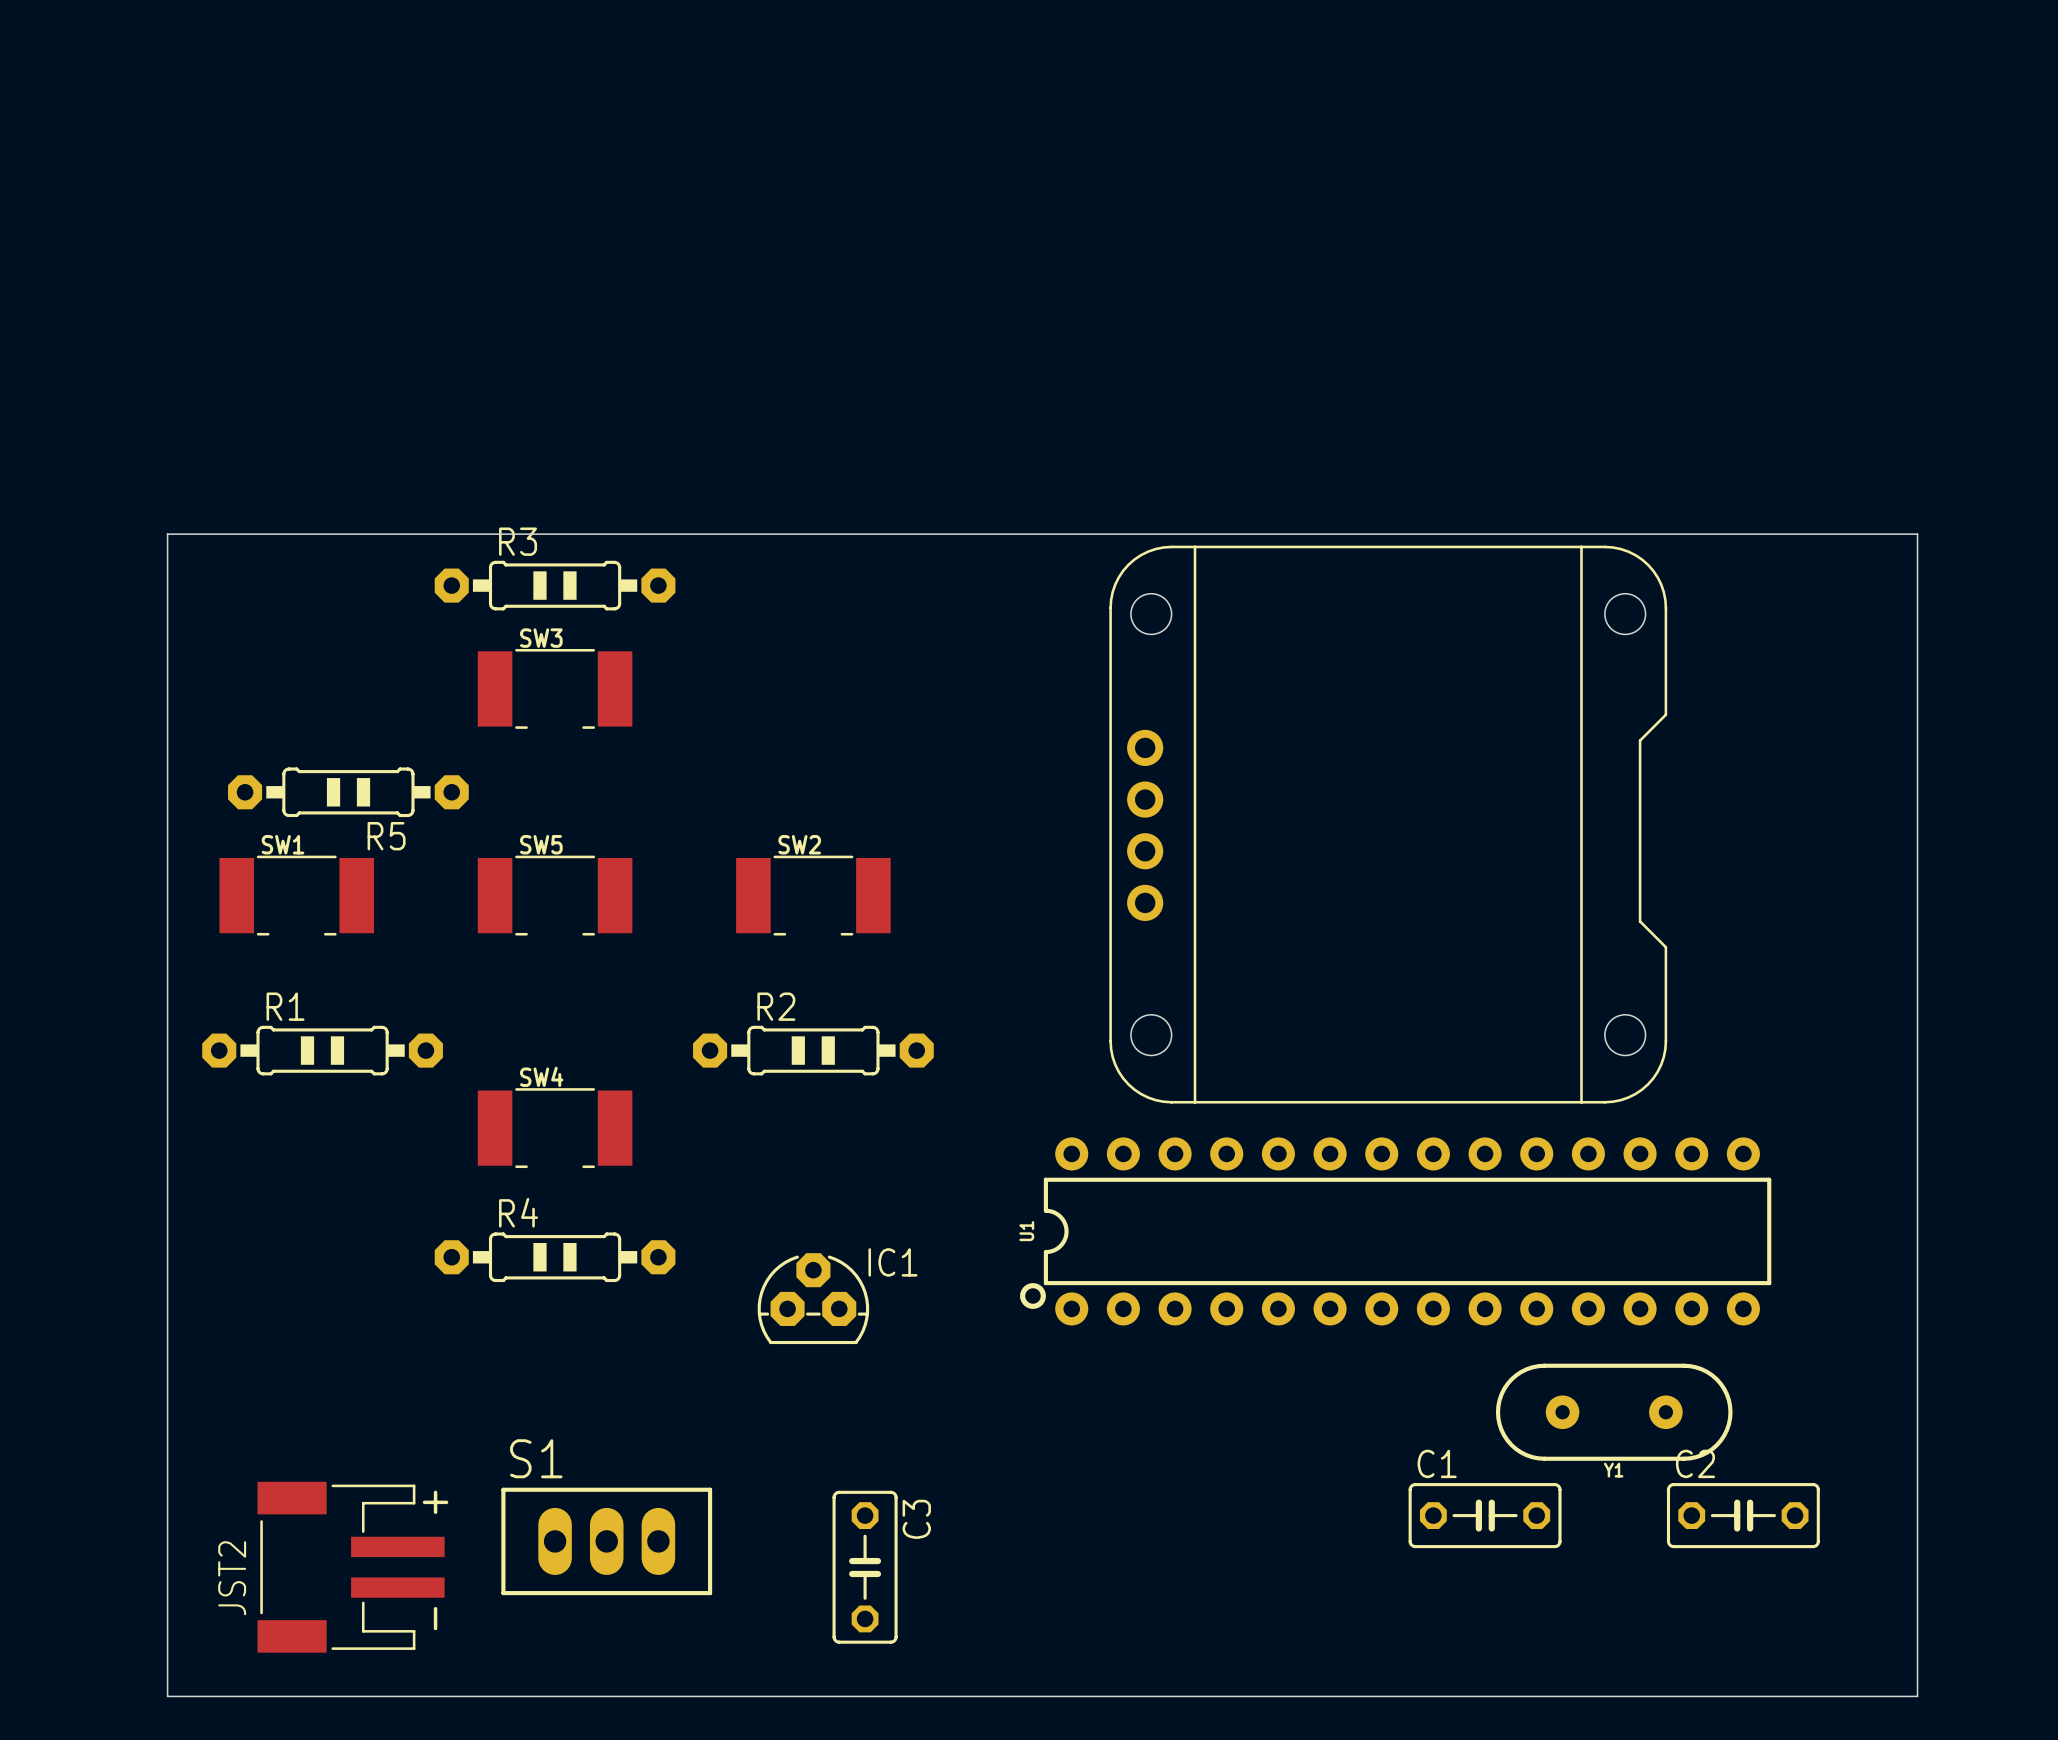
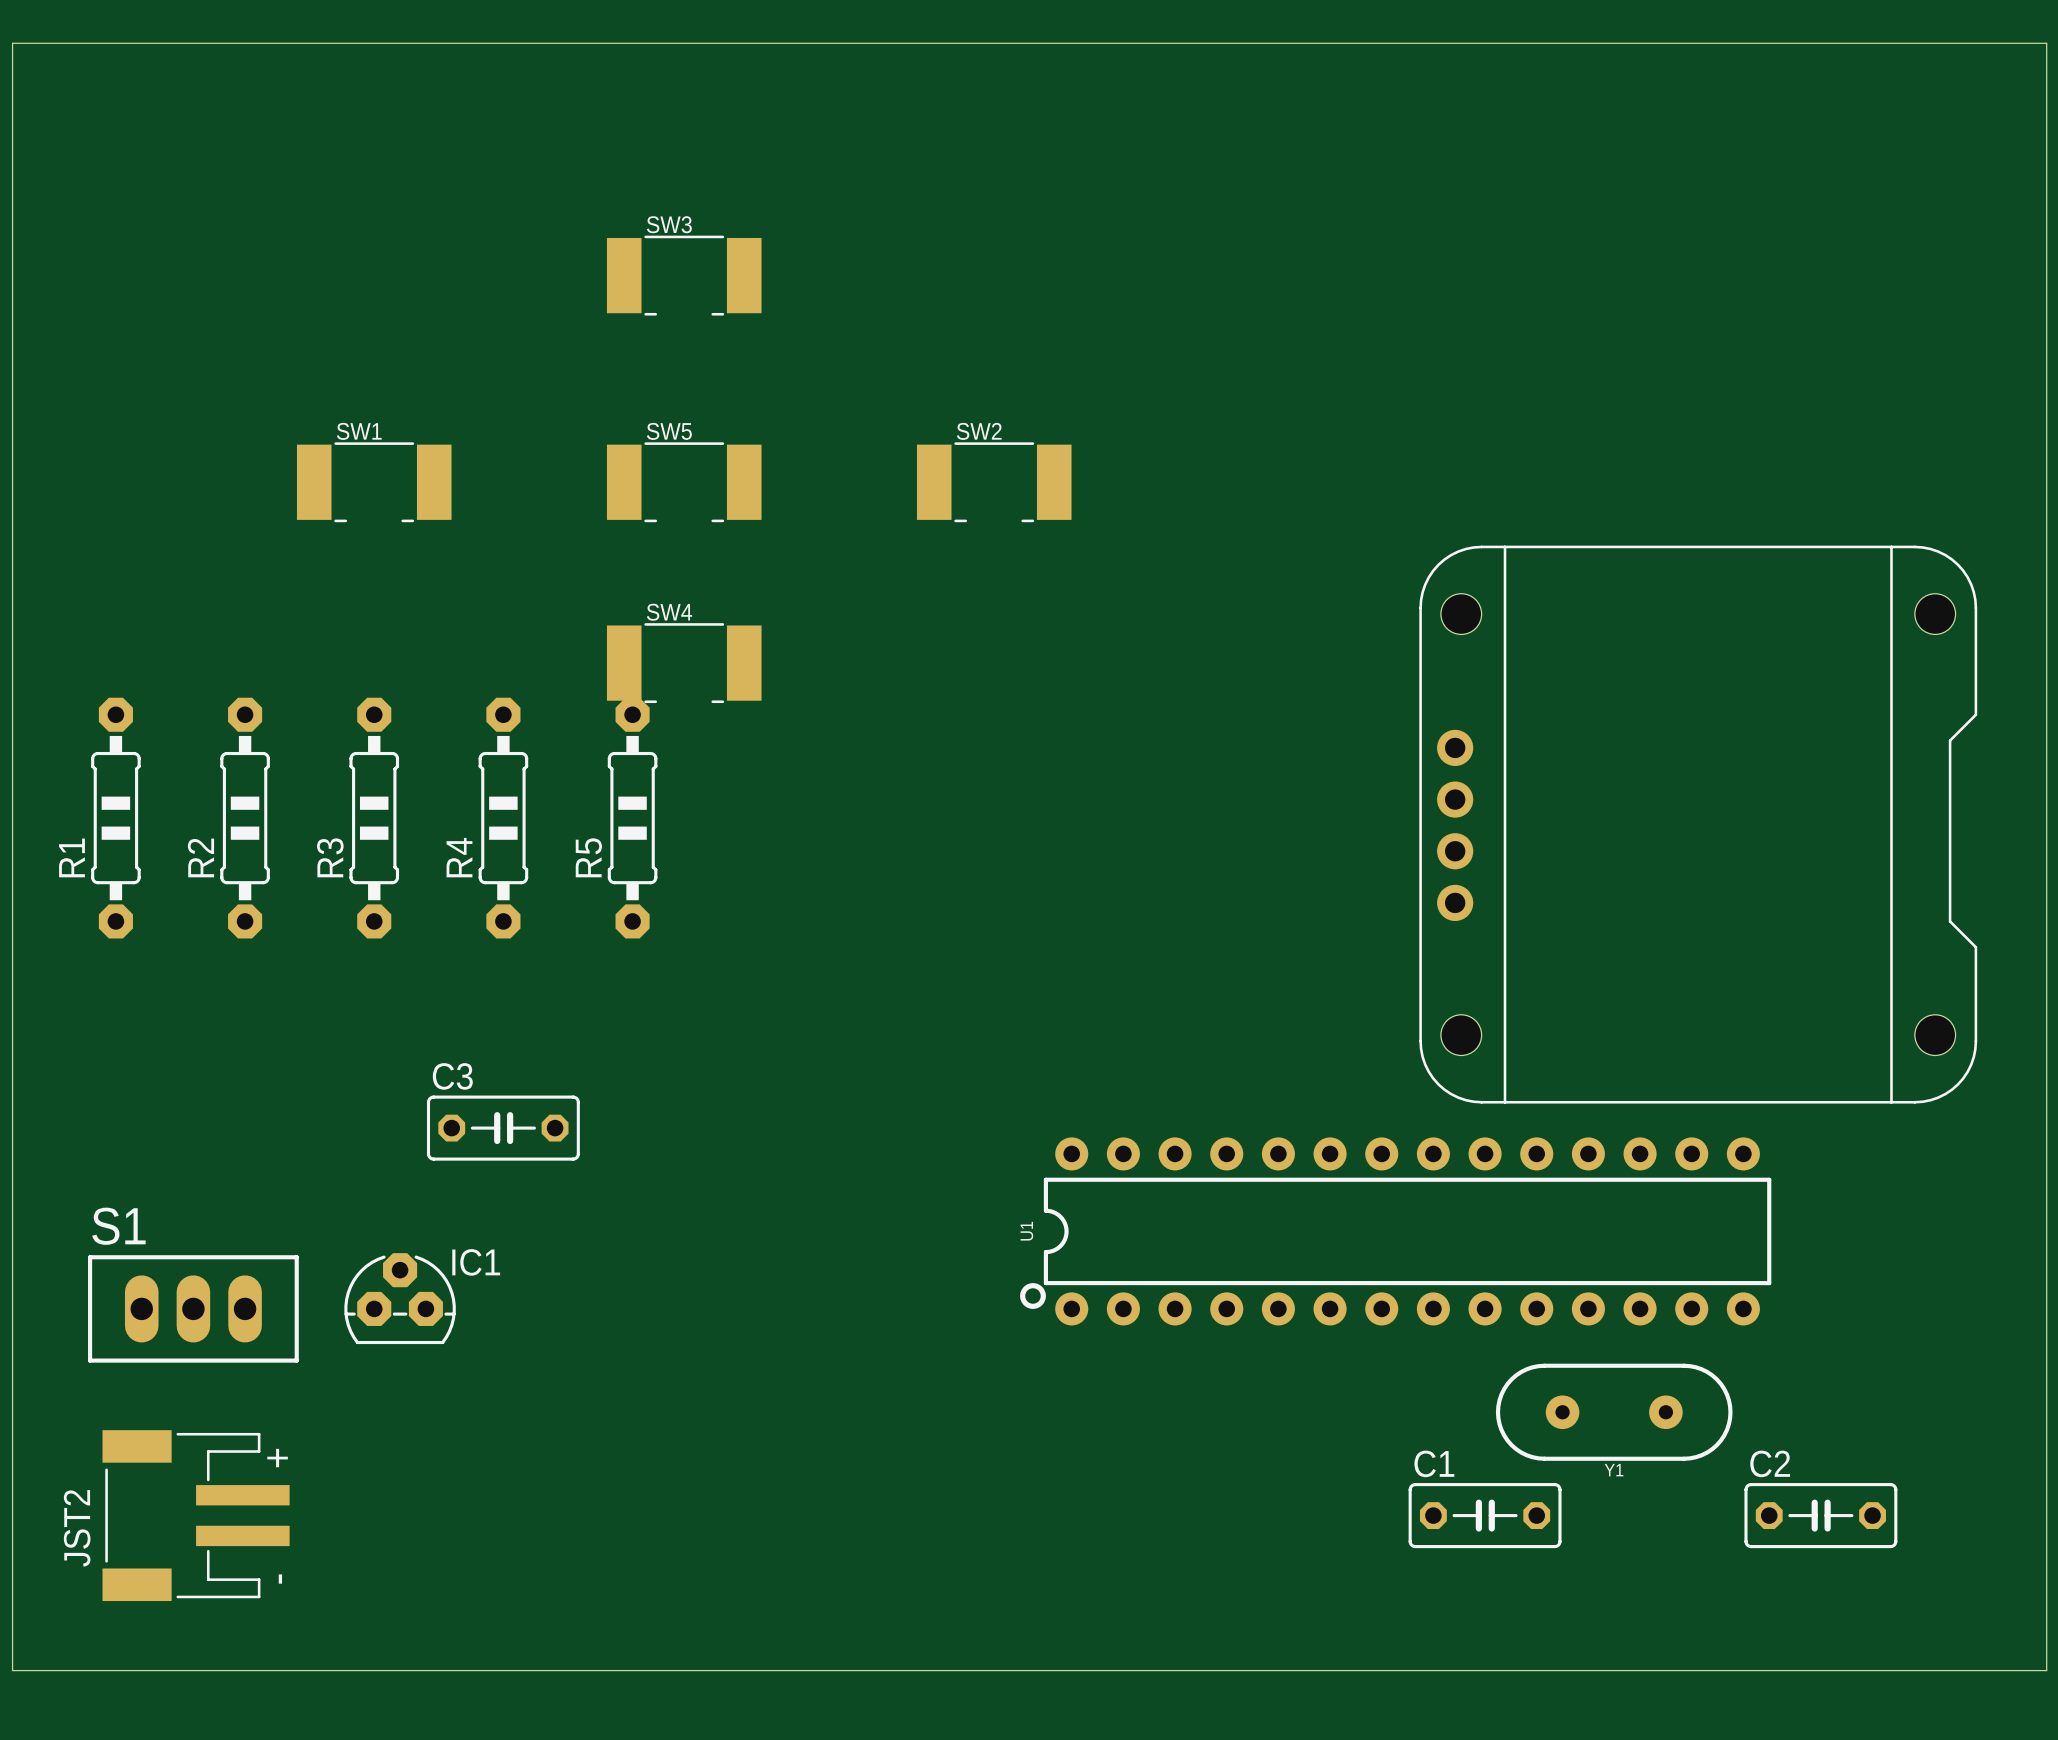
board edge: (167, 534) (1917, 534) (1917, 1696) (167, 1696) (167, 534) -> (12, 43) (12, 1670) (2046, 1670) (2046, 43) (12, 43)
R3 name position: R3 (518, 541) -> R3 (330, 857)
R3 rotation: 0° (555, 585) -> 90° clockwise (374, 818)
R3 position: (555, 585) -> (374, 818)
SW3 position: (555, 688) -> (684, 275)
R5 rotation: 0° (348, 792) -> 90° clockwise (632, 818)
R5 position: (348, 792) -> (632, 818)
part position: (1388, 824) -> (1698, 824)
SW1 position: (296, 895) -> (374, 482)
SW5 position: (555, 895) -> (684, 482)
SW2 position: (813, 895) -> (994, 482)
R1 name position: R1 (285, 1006) -> R1 (71, 857)
R2 name position: R2 (776, 1006) -> R2 (200, 857)
R1 rotation: 0° (322, 1050) -> 90° clockwise (115, 818)
R1 position: (322, 1050) -> (115, 818)
R2 rotation: 0° (813, 1050) -> 90° clockwise (245, 818)
R2 position: (813, 1050) -> (245, 818)
SW4 position: (555, 1128) -> (684, 663)
R4 name position: R4 (518, 1212) -> R4 (459, 857)
R4 rotation: 0° (555, 1257) -> 90° clockwise (503, 818)
R4 position: (555, 1257) -> (503, 818)
IC1 position: (813, 1298) -> (400, 1298)
C2 position: (1743, 1515) -> (1820, 1515)
S1 position: (606, 1541) -> (193, 1308)
JST2 position: (351, 1567) -> (196, 1515)
C3 rotation: 0° (865, 1567) -> 90° counterclockwise (503, 1128)
C3 position: (865, 1567) -> (503, 1128)

